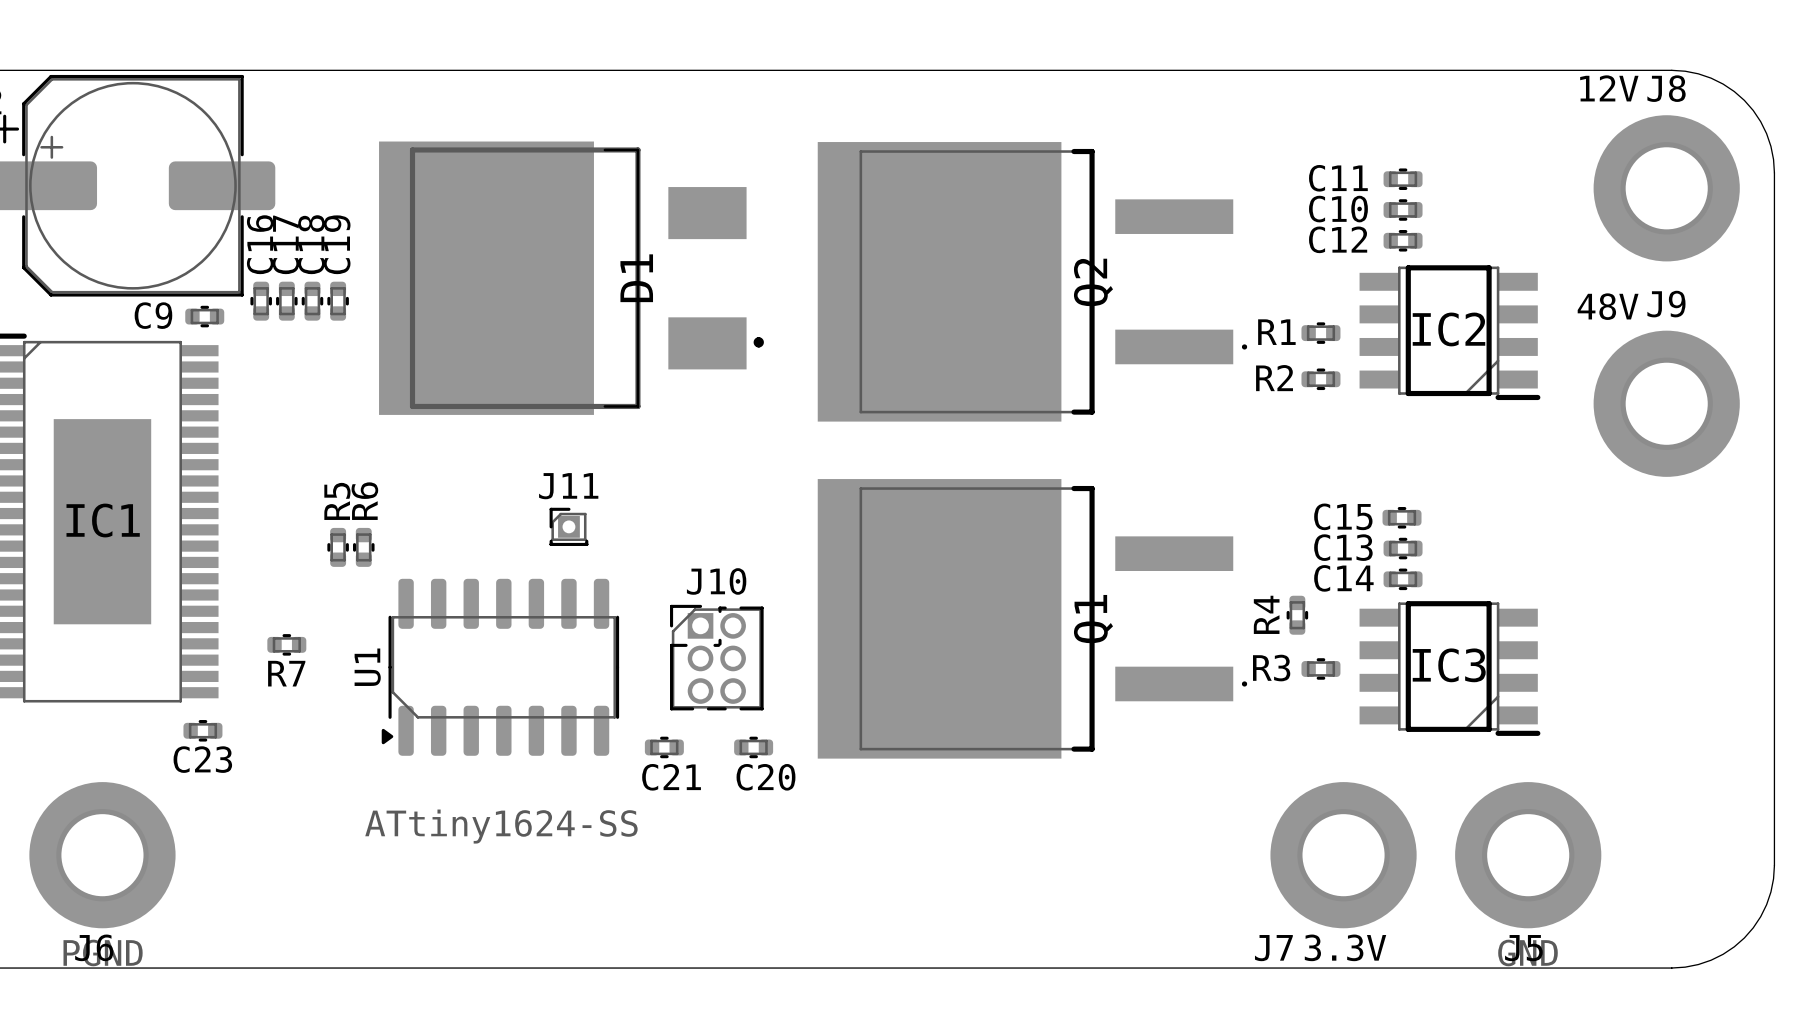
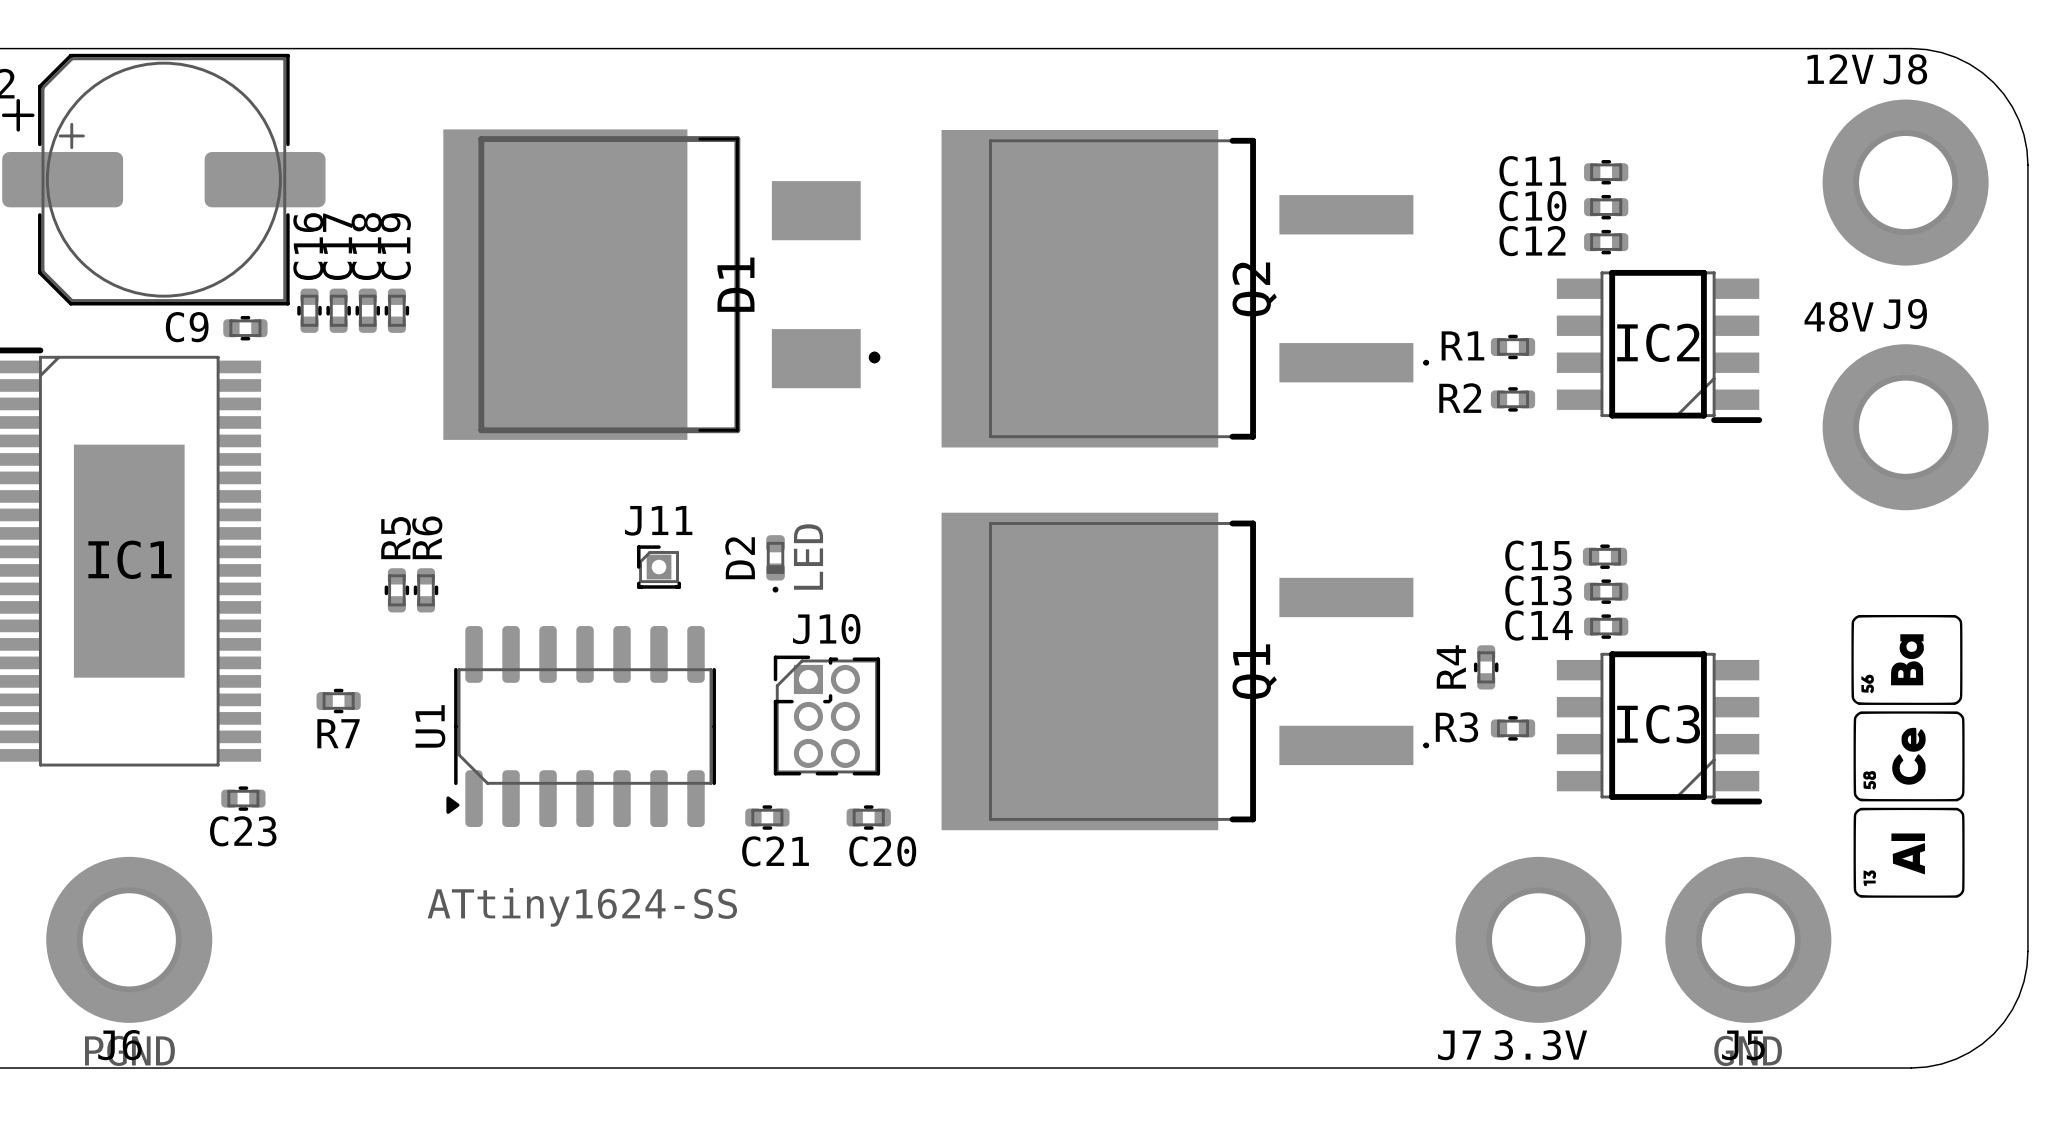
D2: none -> LED (775, 563)
drawing: none -> [1851, 614, 1965, 898]

